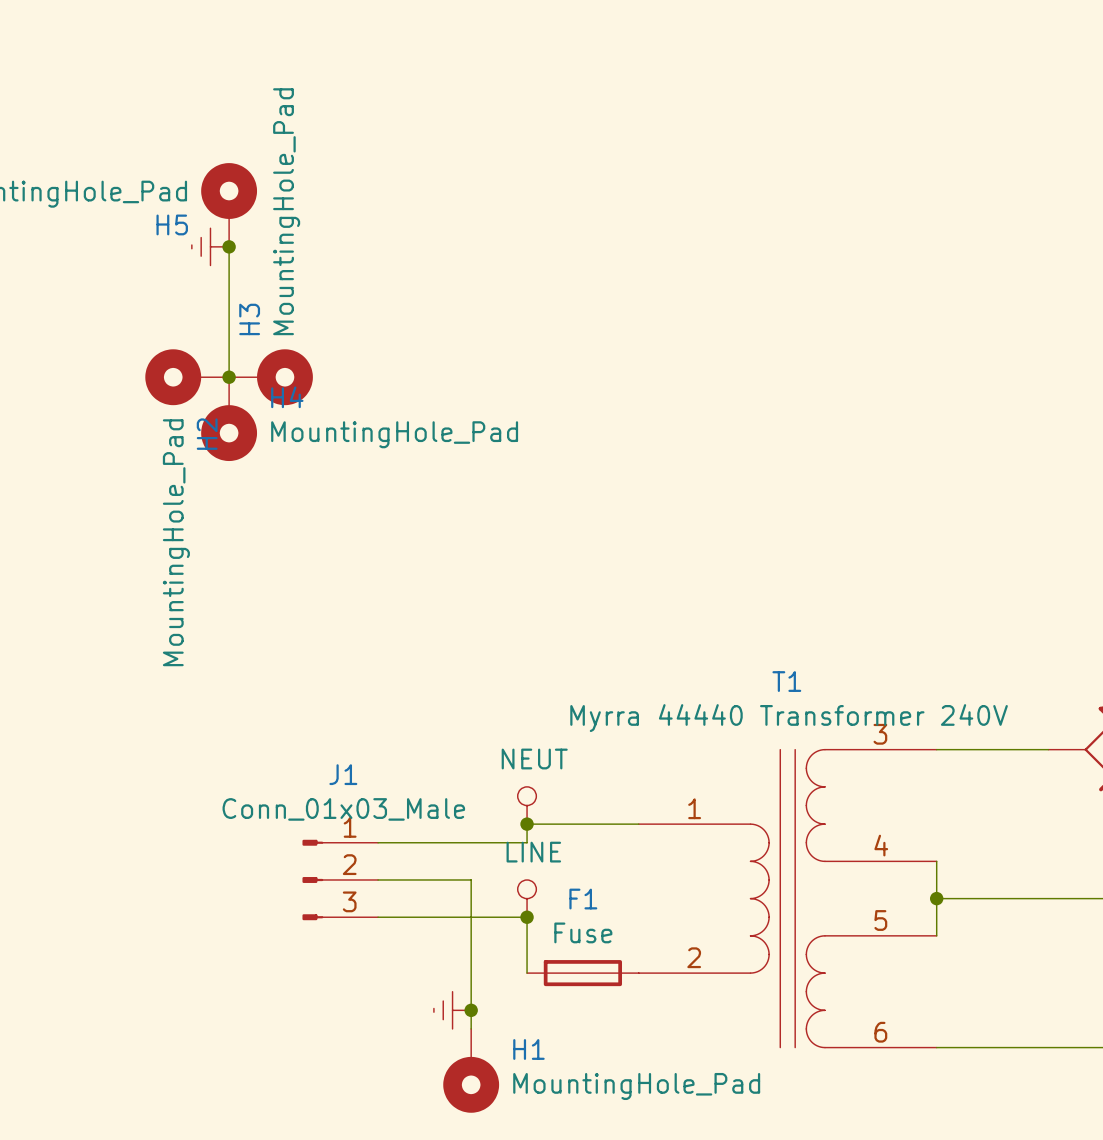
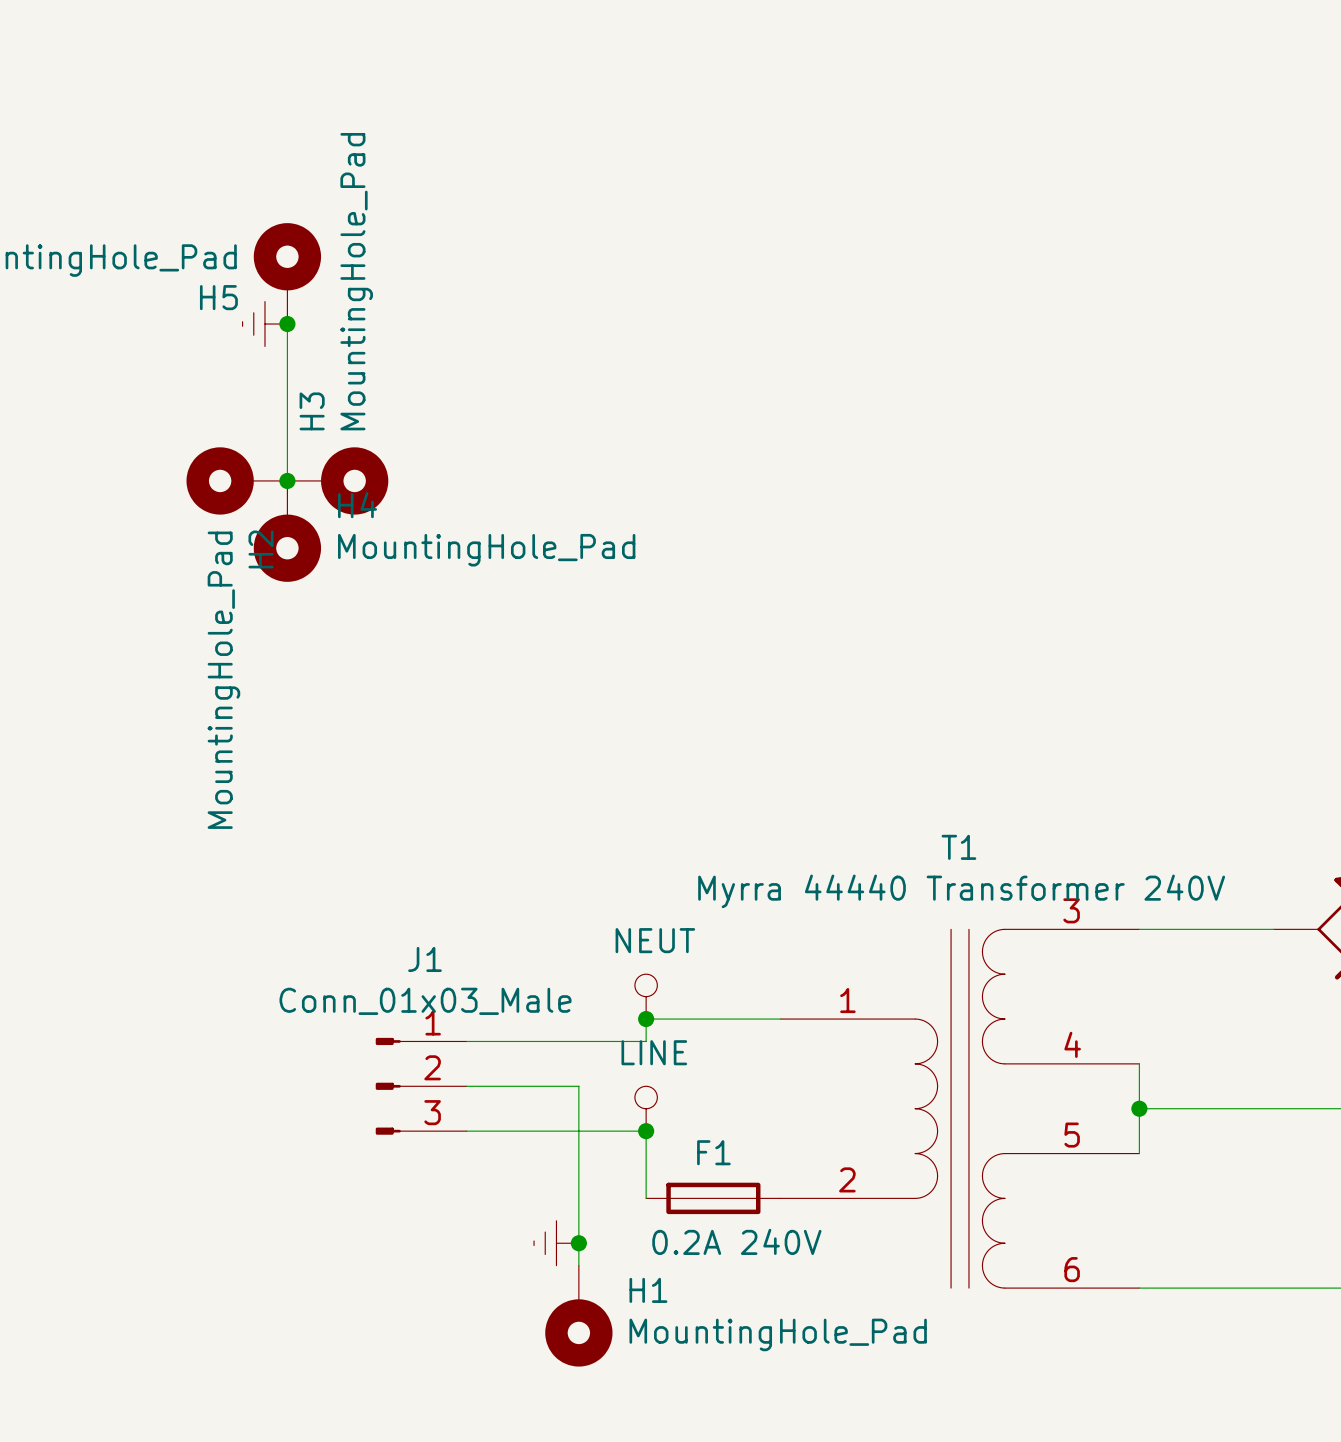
F1 name position: F1 (583, 899) -> F1 (713, 1152)
F1 value: Fuse (583, 932) -> 0.2A 240V (736, 1241)

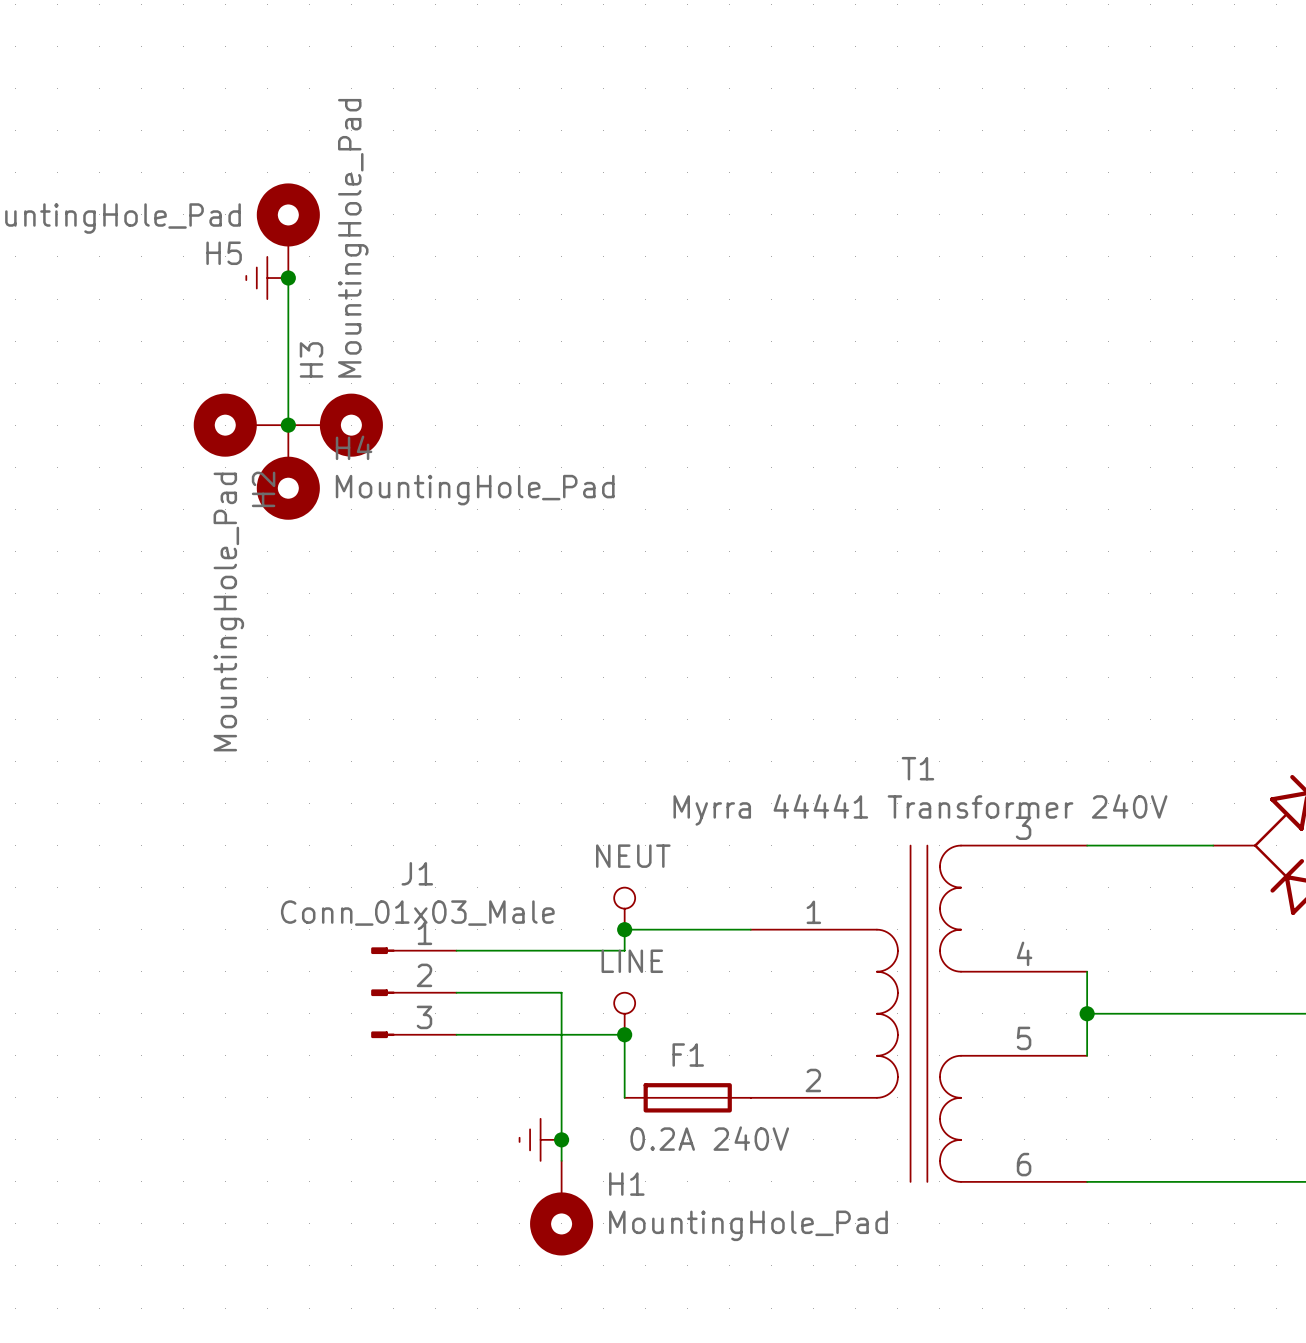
T1 value: Myrra 44440 Transformer 240V (961, 891) -> Myrra 44441 Transformer 240V (920, 809)

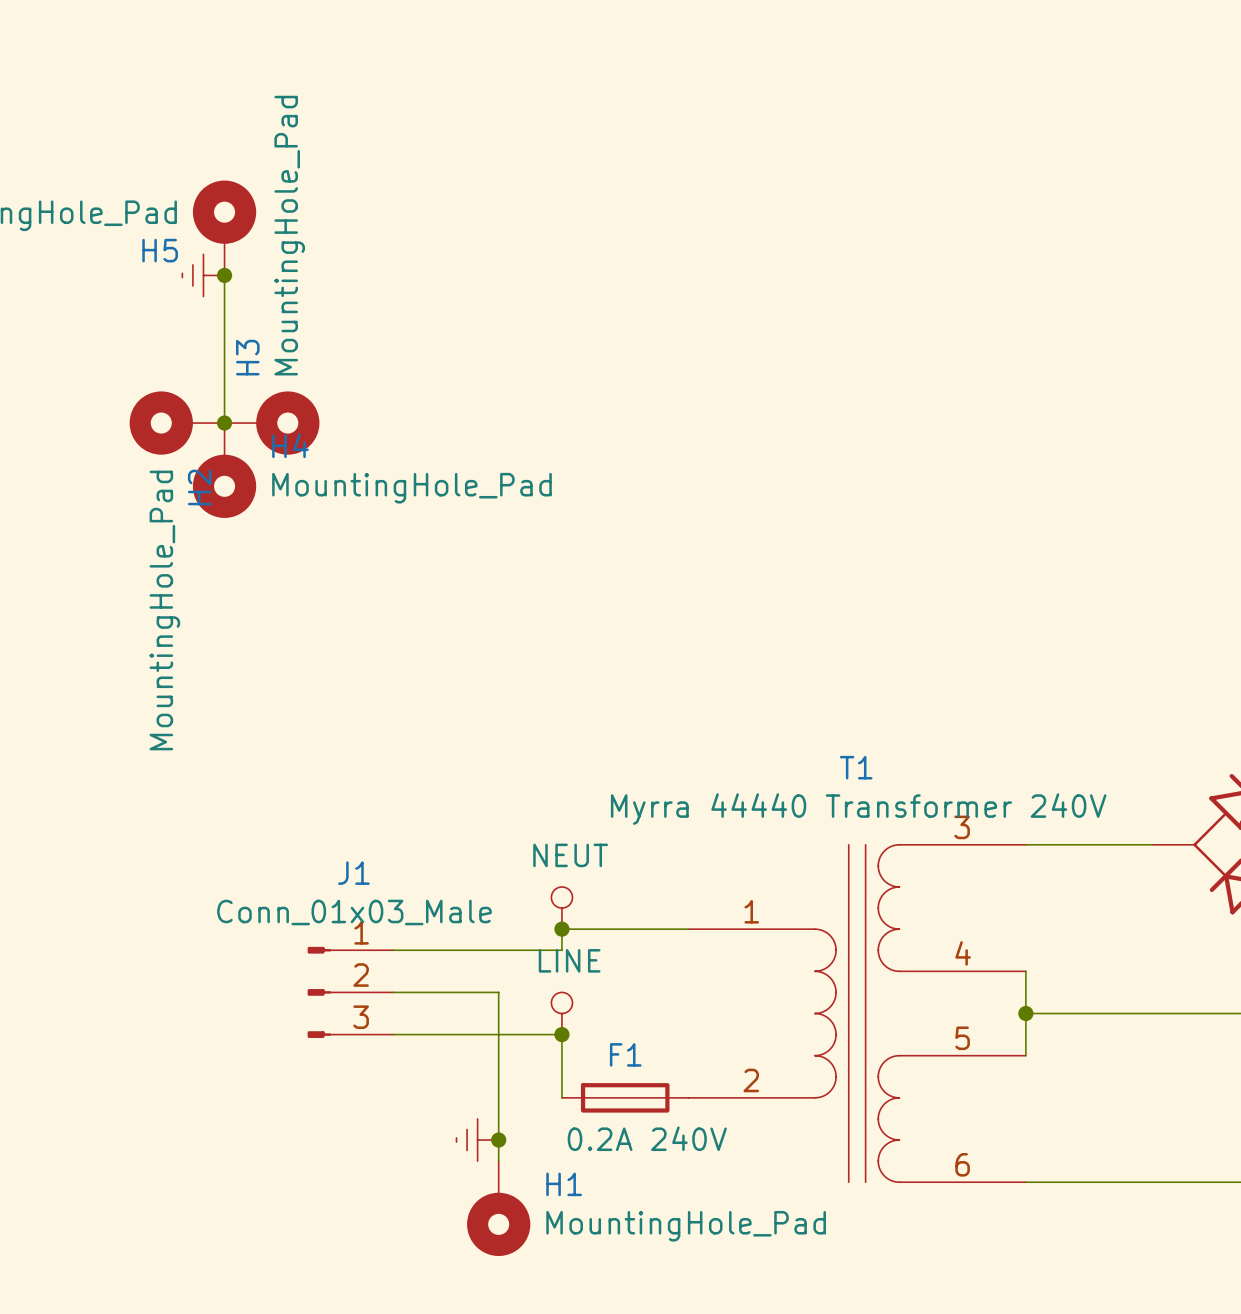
T1 value: Myrra 44441 Transformer 240V (920, 809) -> Myrra 44440 Transformer 240V (858, 809)

